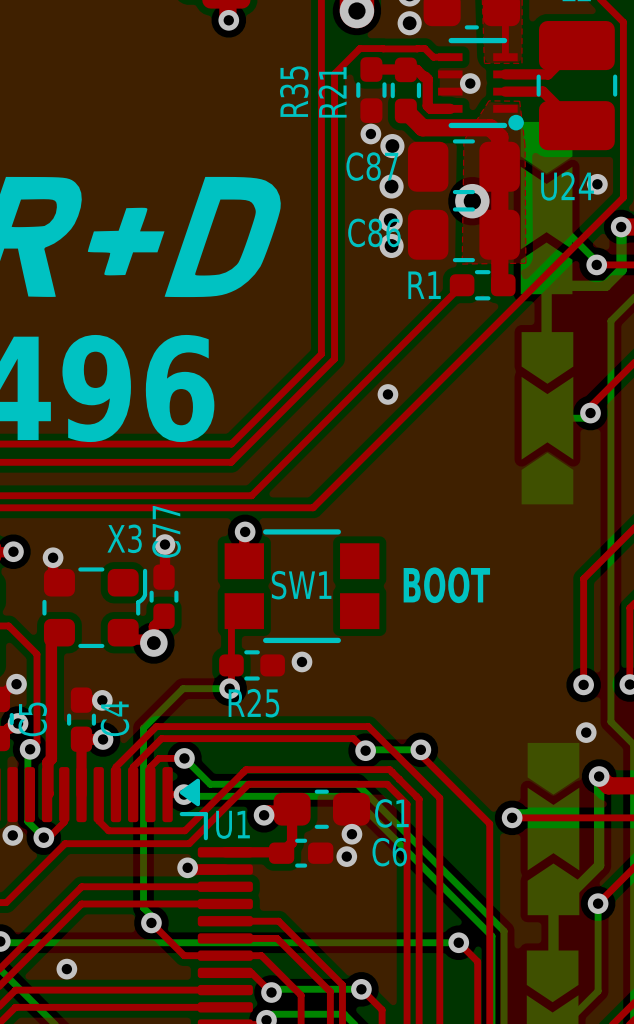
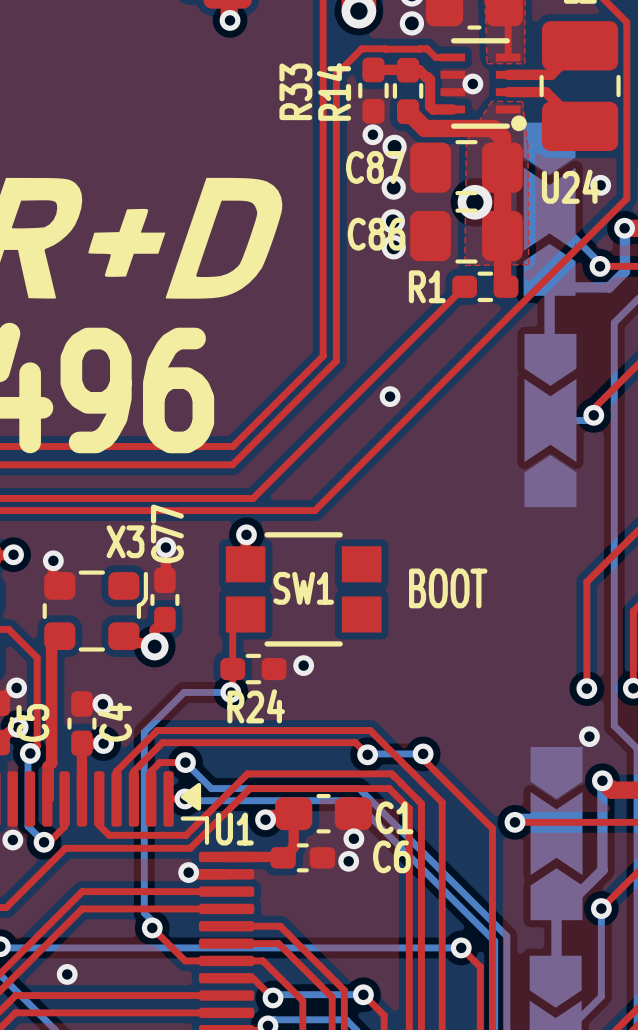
R35 name: R35 (294, 91) -> R33 (295, 91)
R21 name: R21 (332, 92) -> R14 (333, 92)
R25 name: R25 (253, 703) -> R24 (256, 706)

